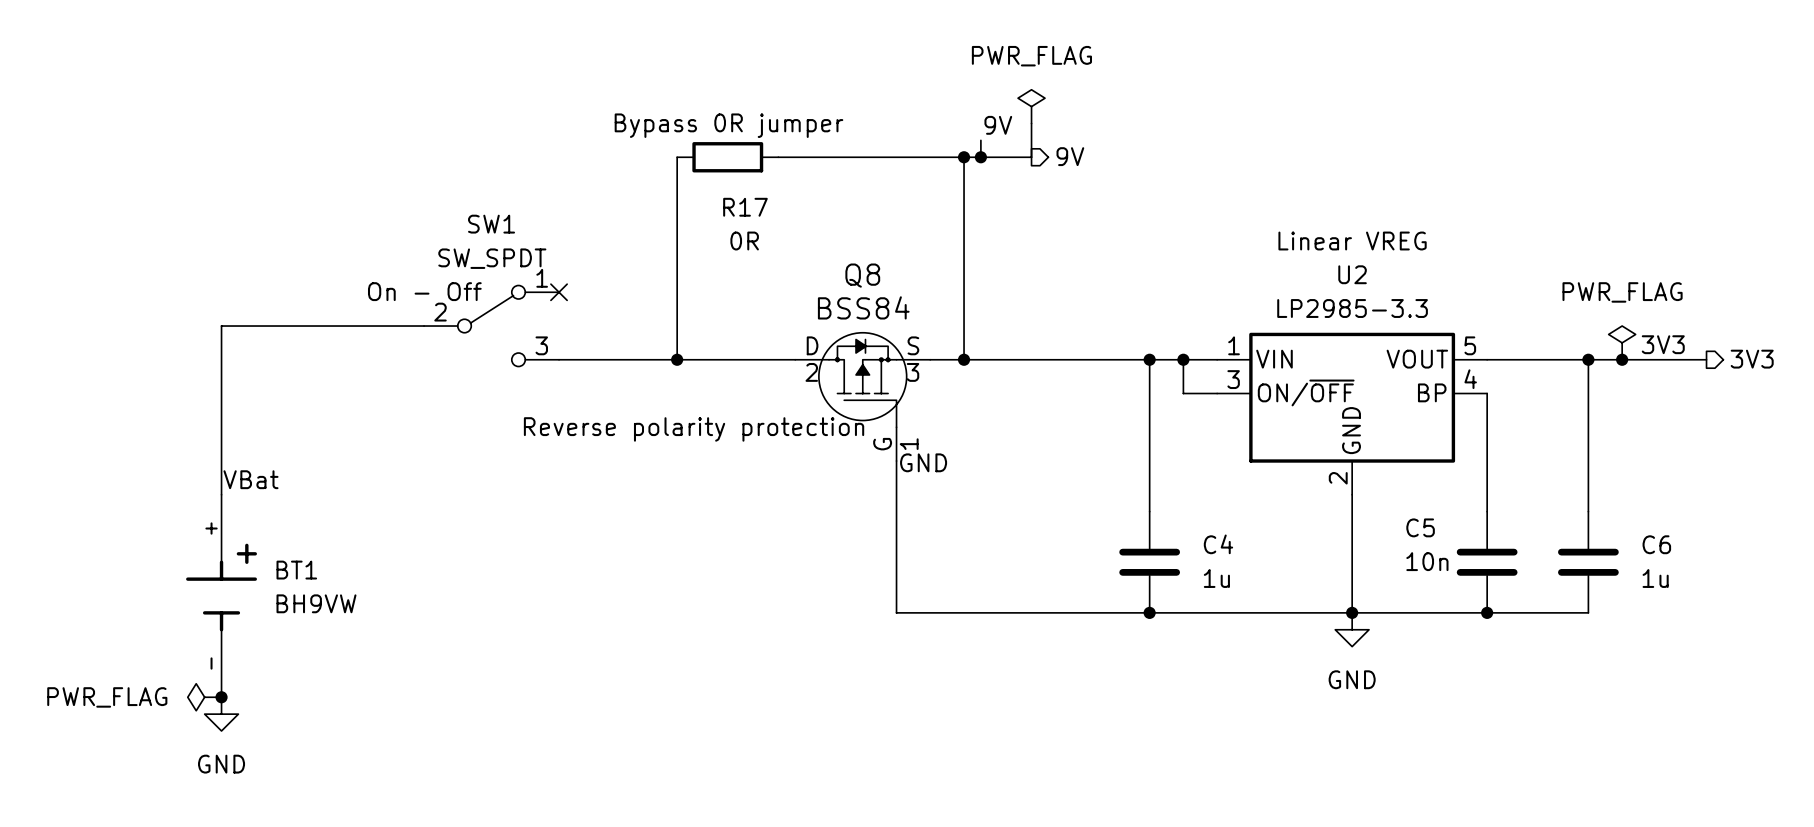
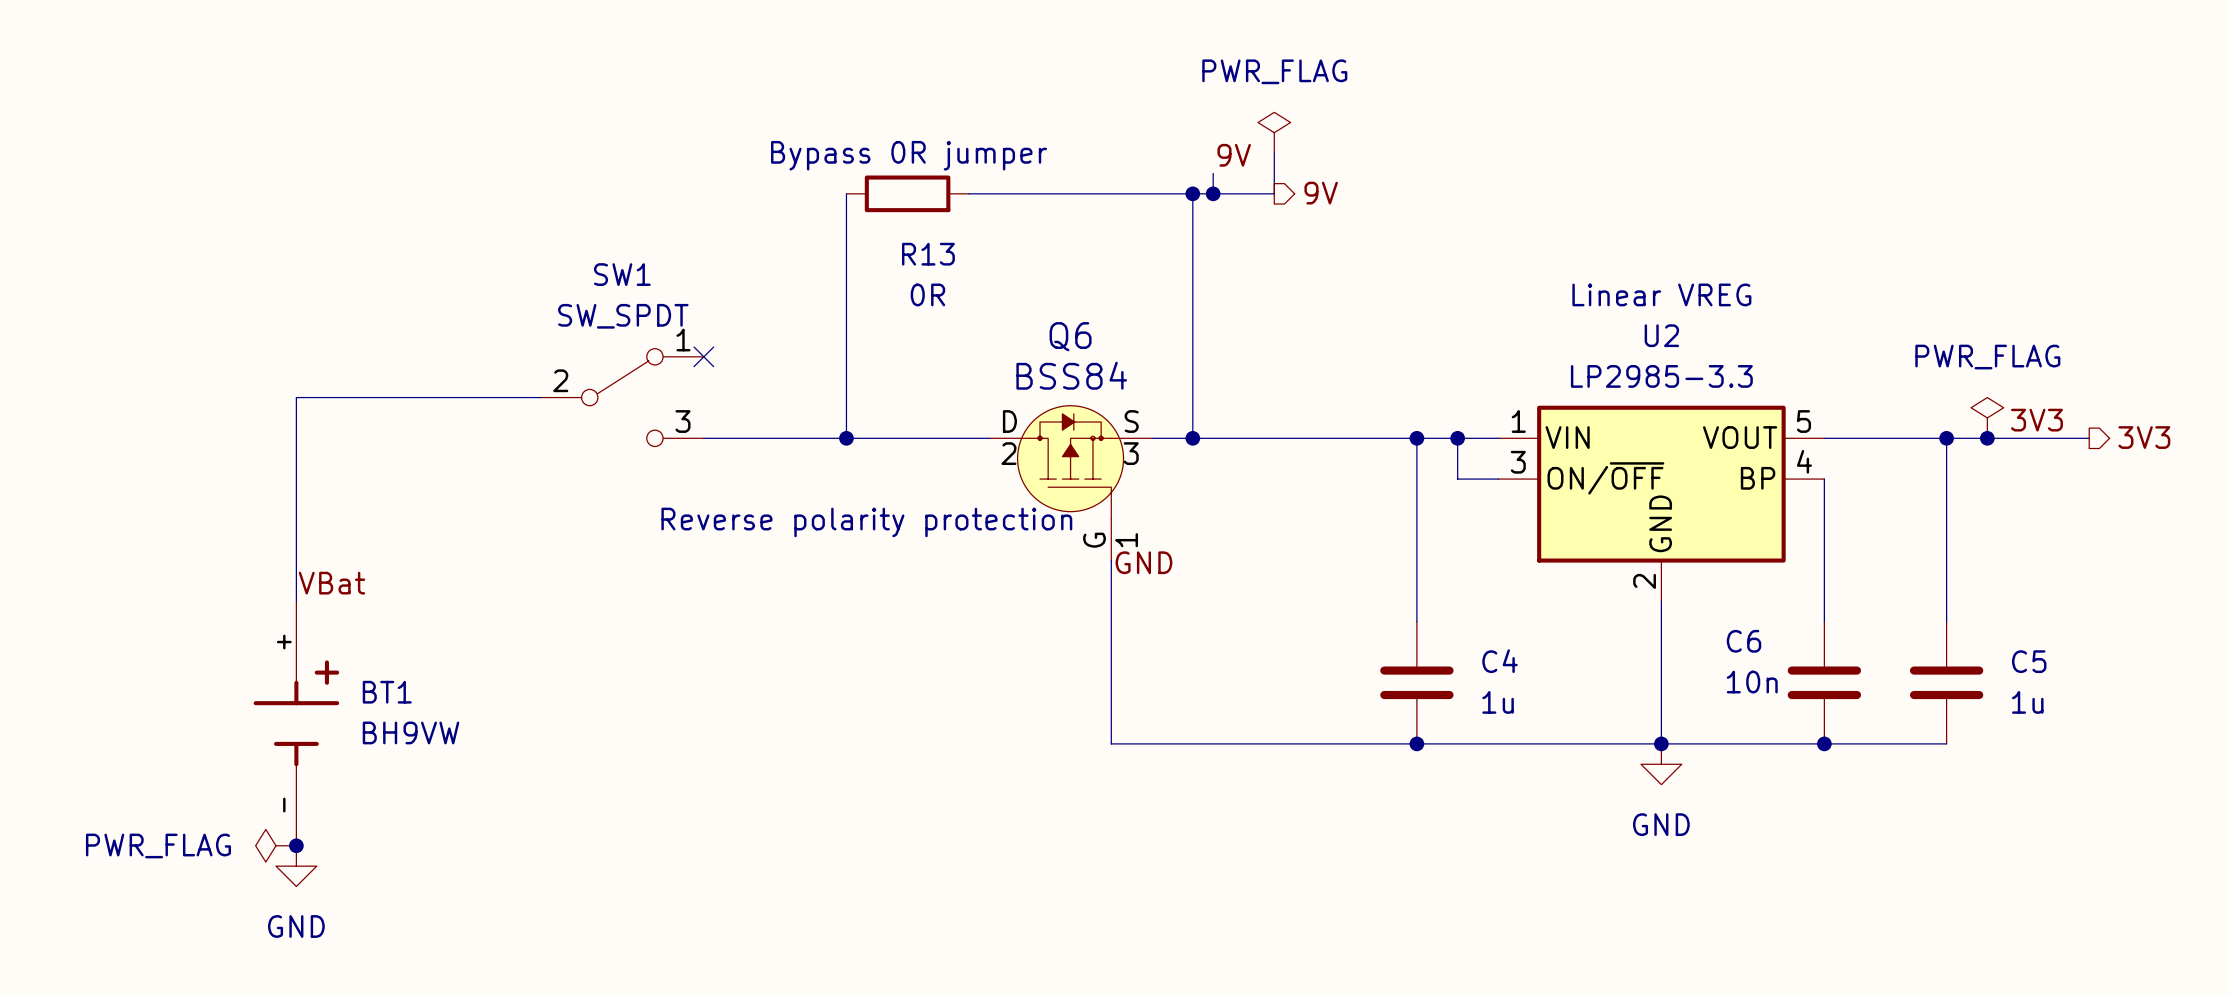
R17 name: R17 (745, 207) -> R13 (928, 254)
Q8 name: Q8 (862, 275) -> Q6 (1070, 336)
SW1 text: On - Off (424, 291) -> none
C5 name: C5 (1420, 527) -> C6 (1744, 641)
C6 name: C6 (1656, 544) -> C5 (2029, 661)

